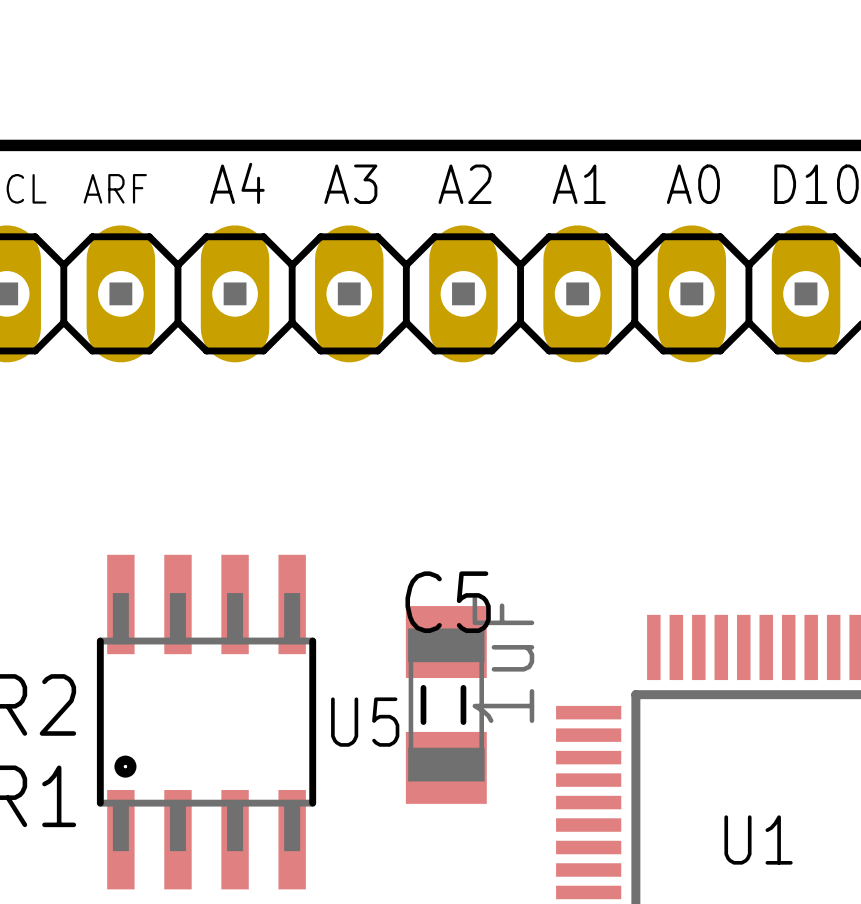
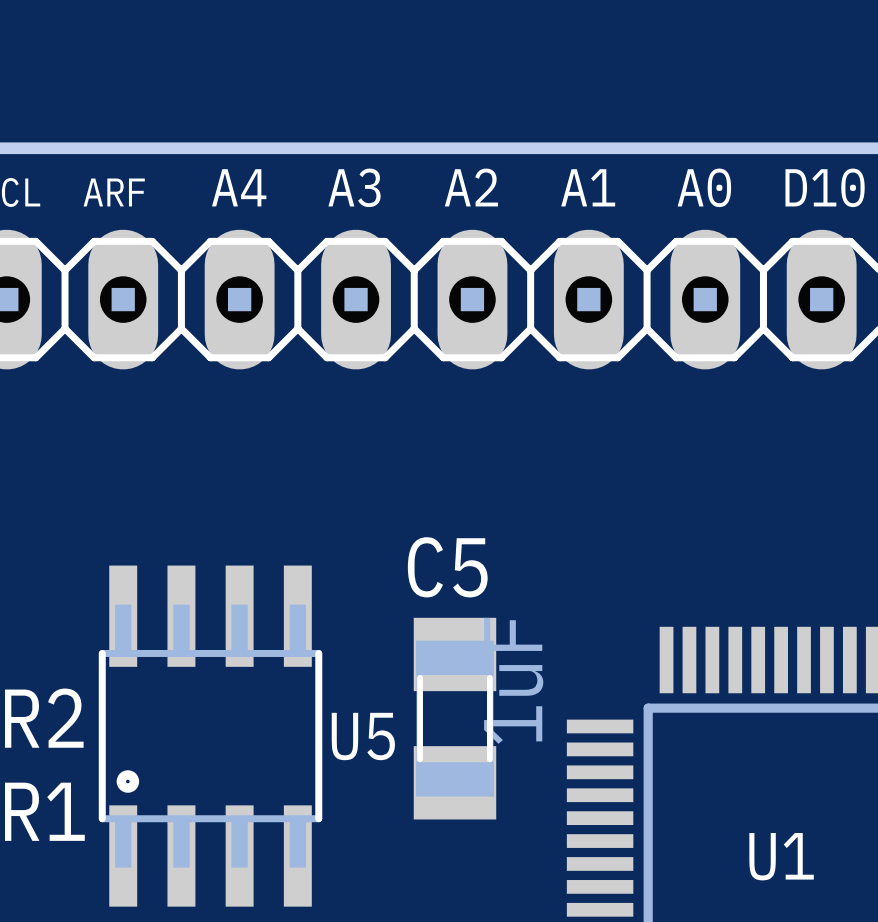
C5 name position: C5 (448, 602) -> C5 (447, 567)
line: none -> (420, 677) (420, 759)
line: none -> (489, 677) (489, 759)
line: (423, 687) (423, 722) -> none
line: (463, 687) (463, 722) -> none

